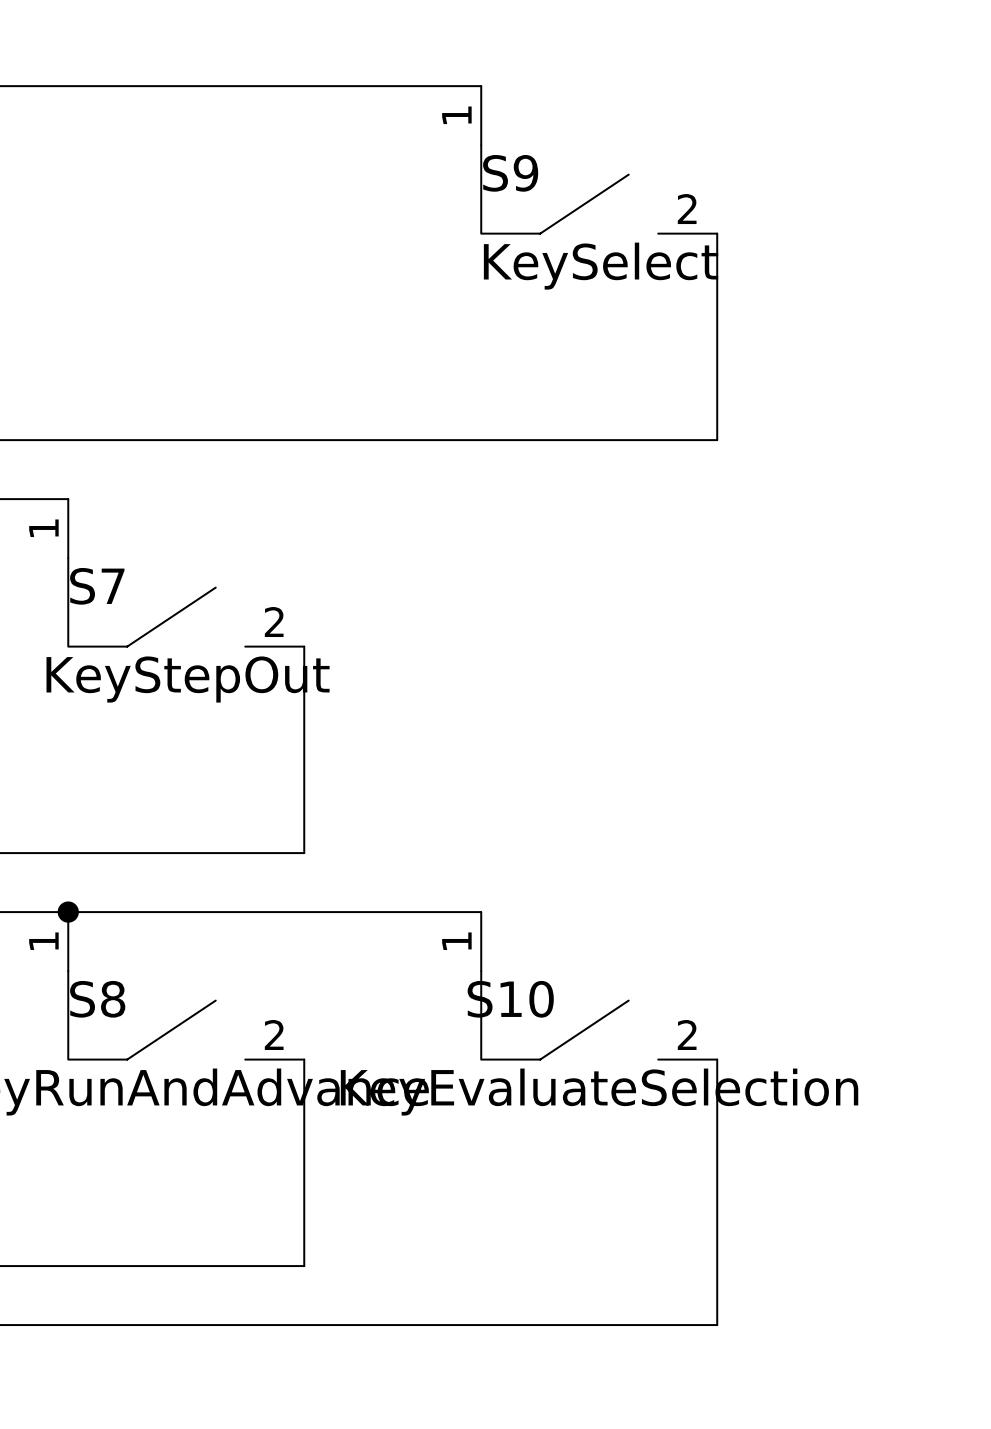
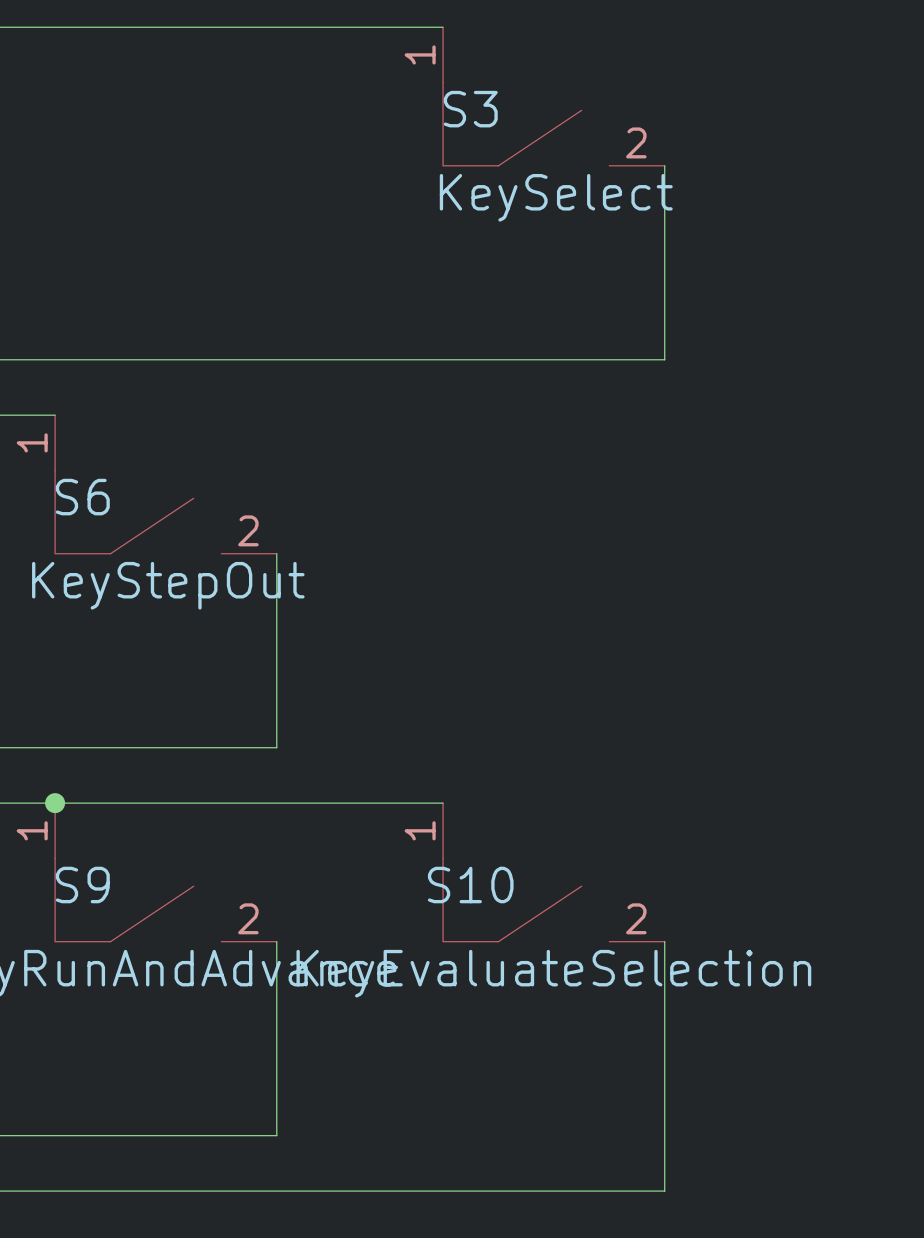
S9 name: S9 (510, 173) -> S3 (470, 109)
S7 name: S7 (97, 586) -> S6 (82, 497)
S8 name: S8 (97, 999) -> S9 (82, 885)

